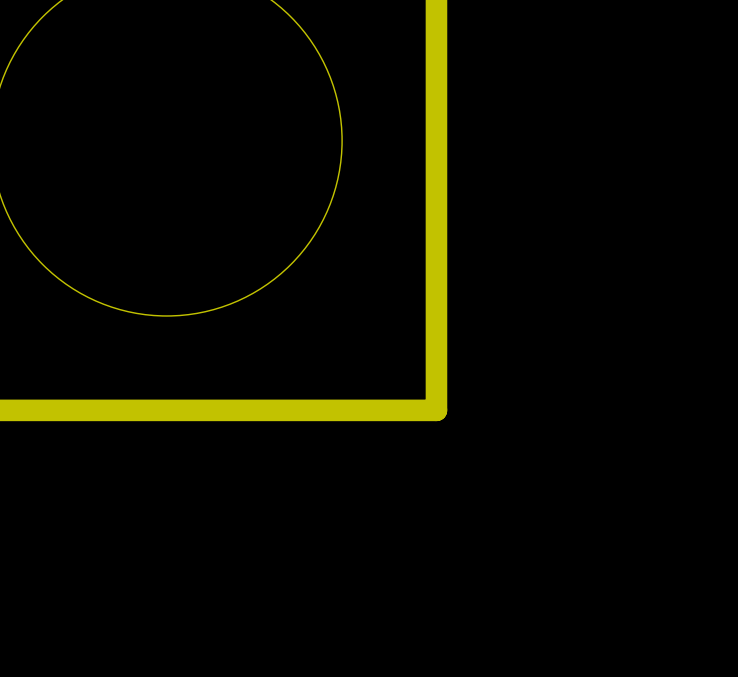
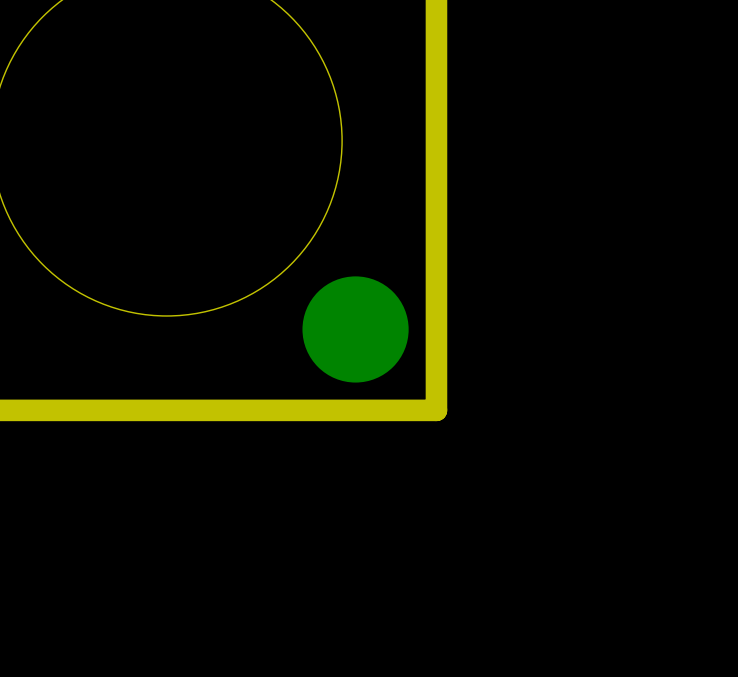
part: none -> (355, 329)

